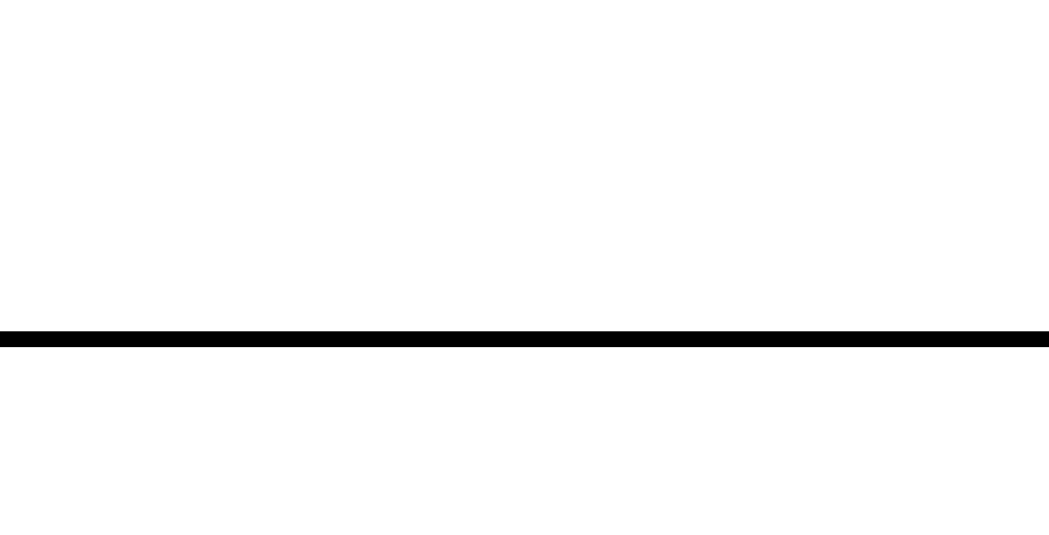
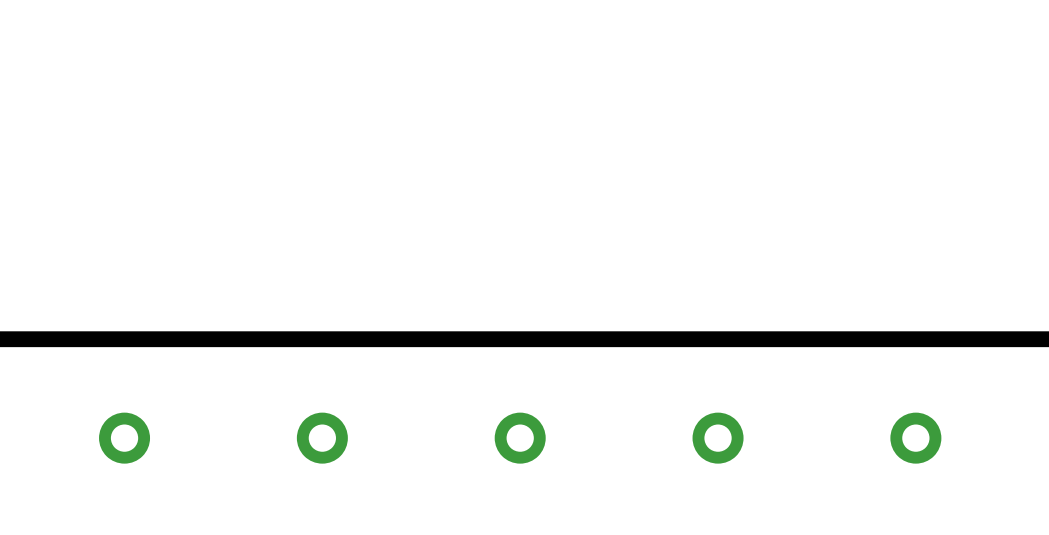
via: none -> (124, 438)
via: none -> (322, 438)
via: none -> (520, 438)
via: none -> (718, 438)
via: none -> (915, 438)

